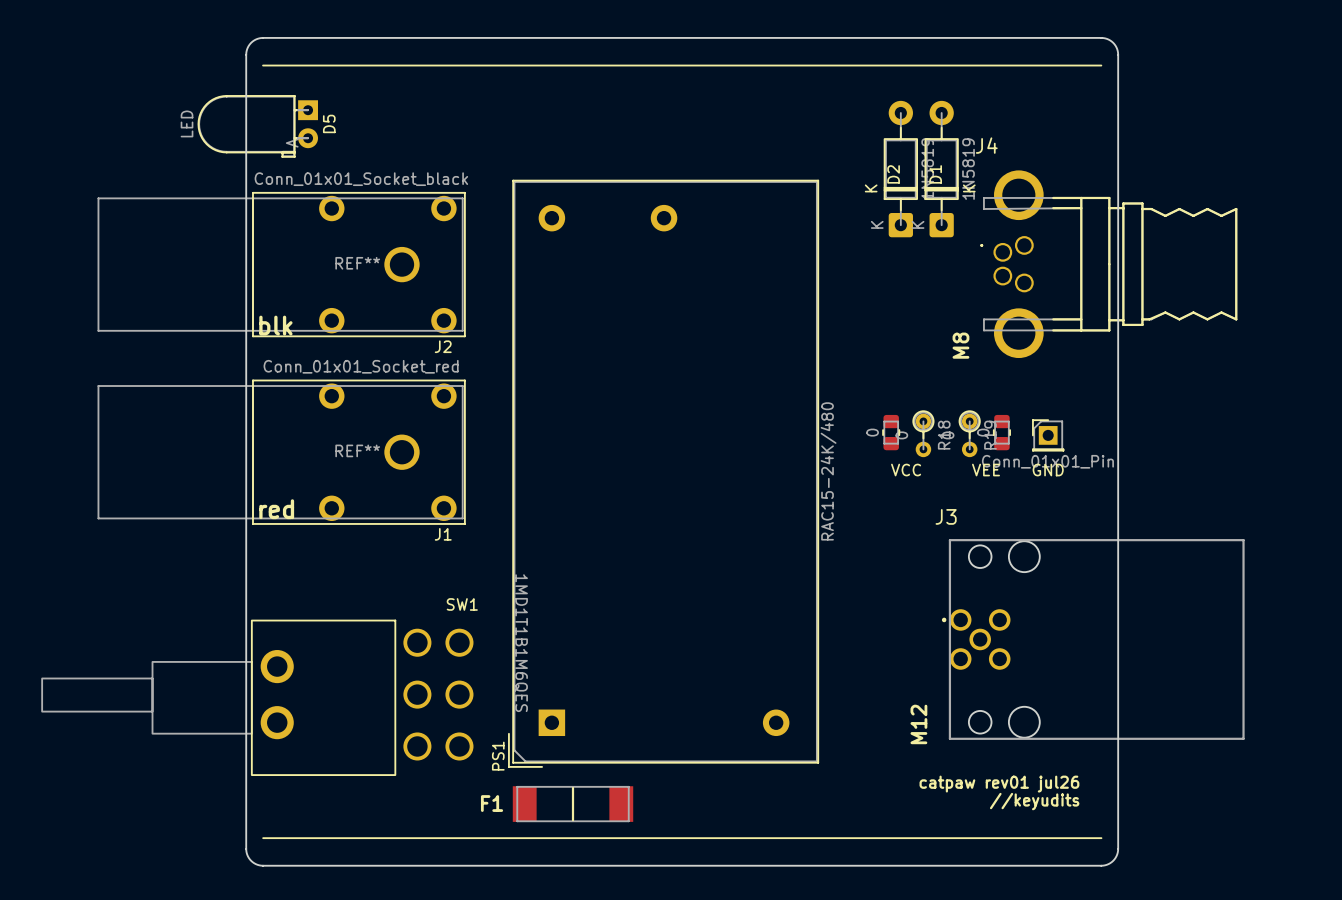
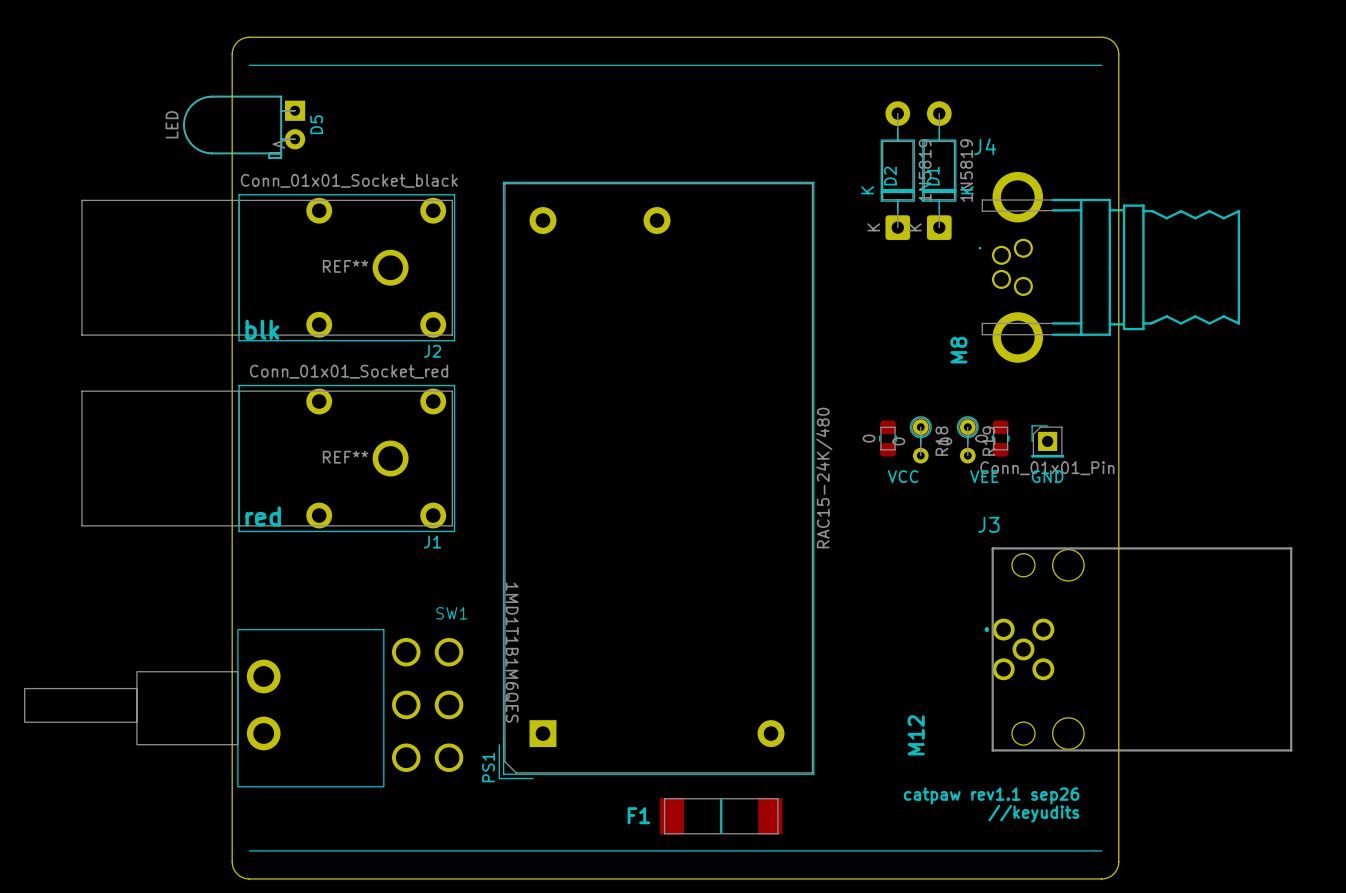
J3 position: (1093, 639) -> (1138, 649)
text: catpaw rev01 jul26 (999, 784) -> catpaw rev1.1 sep26 (991, 795)
F1 position: (573, 804) -> (721, 816)

